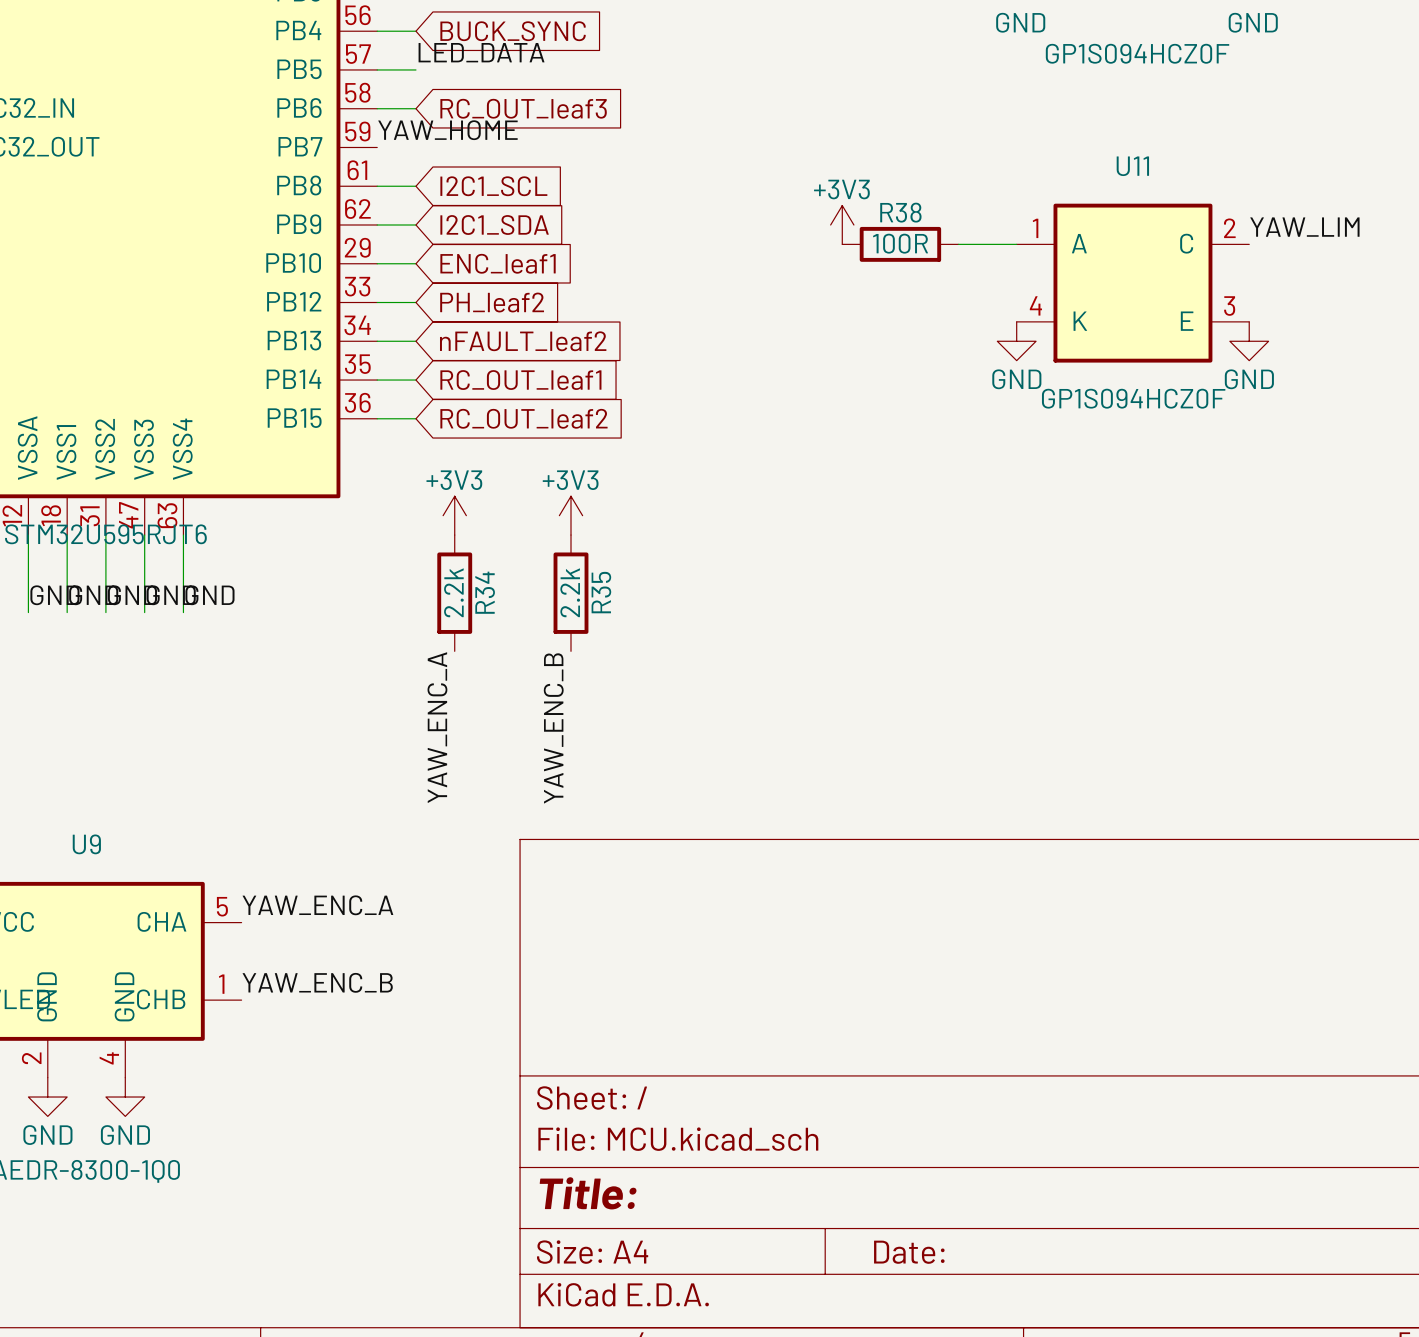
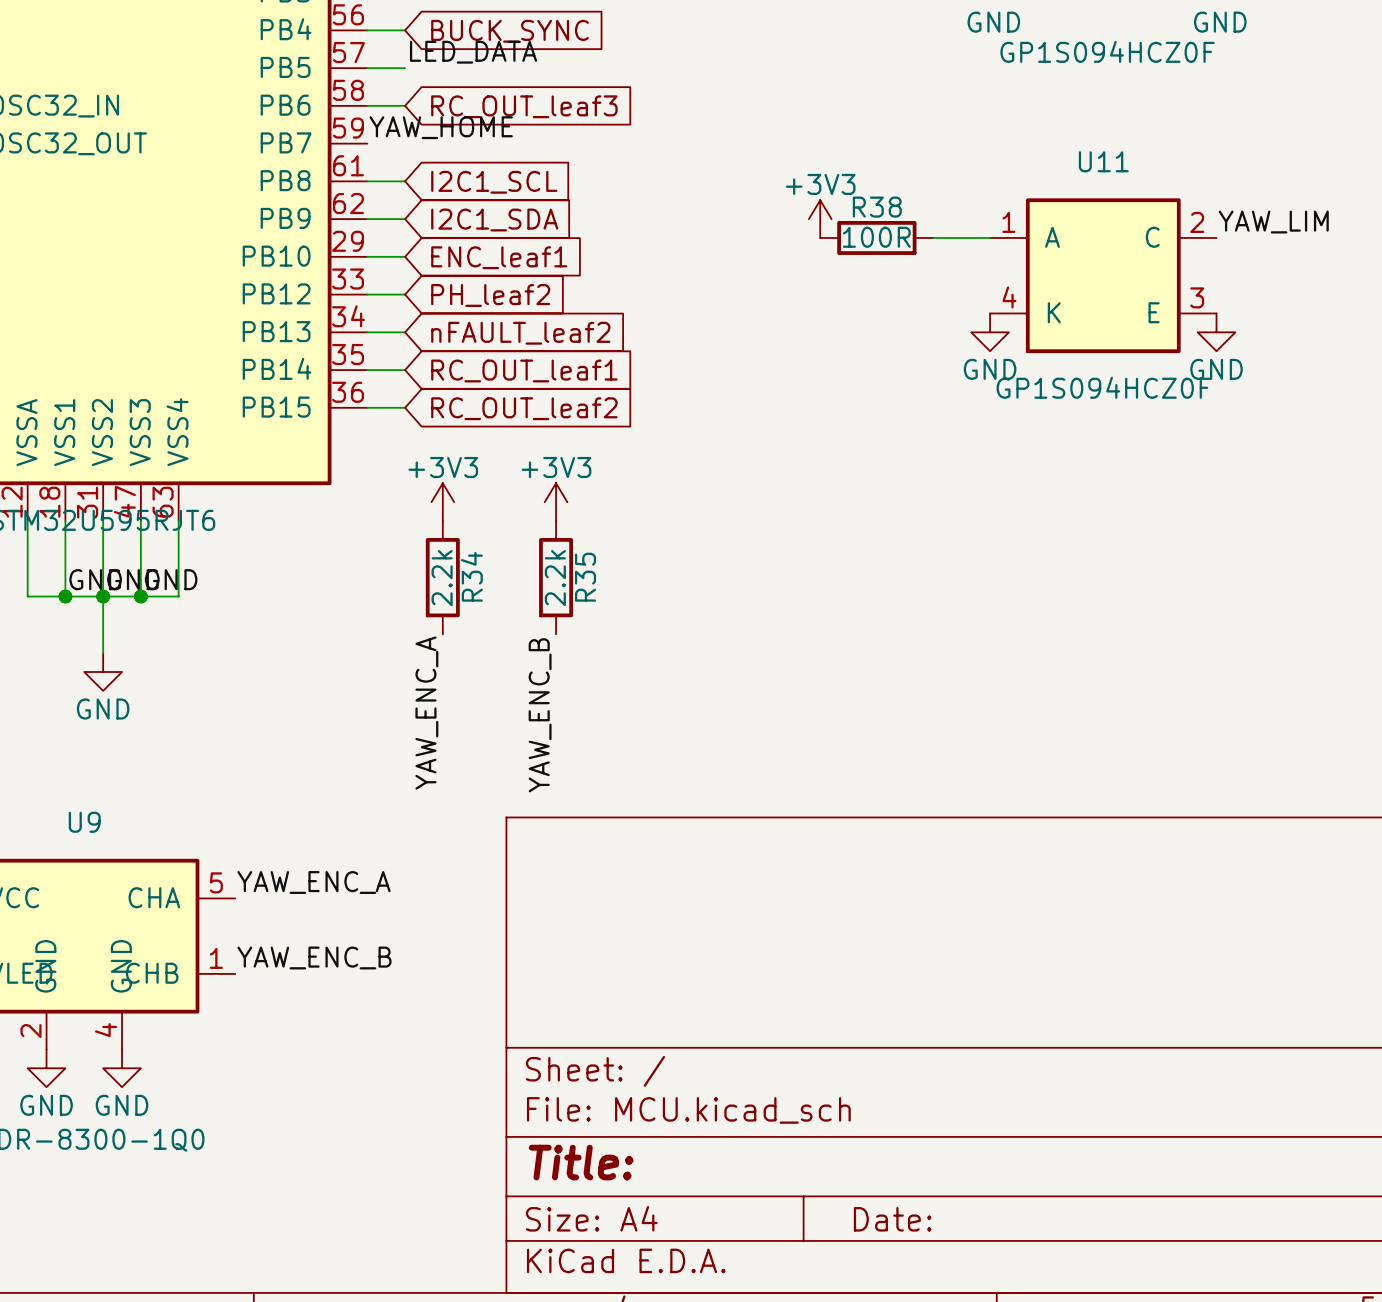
label: GND (54, 595) -> none
label: GND (209, 595) -> none
wire: none -> (27, 596) (178, 596)
junction: none -> (65, 596)
wire: none -> (103, 596) (103, 653)
junction: none -> (103, 596)
junction: none -> (140, 596)
power symbol: none -> GND (103, 672)

